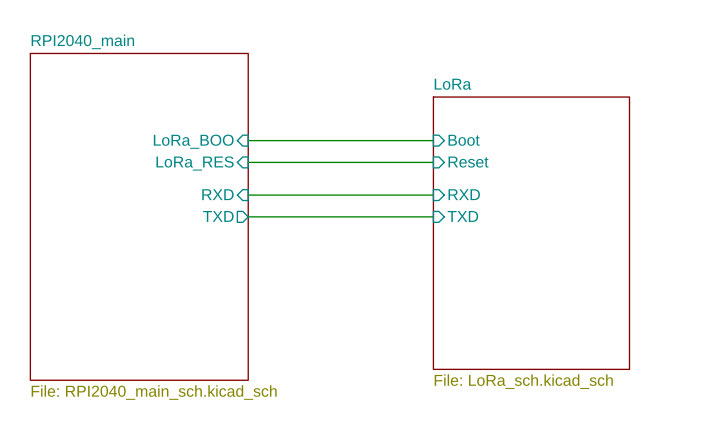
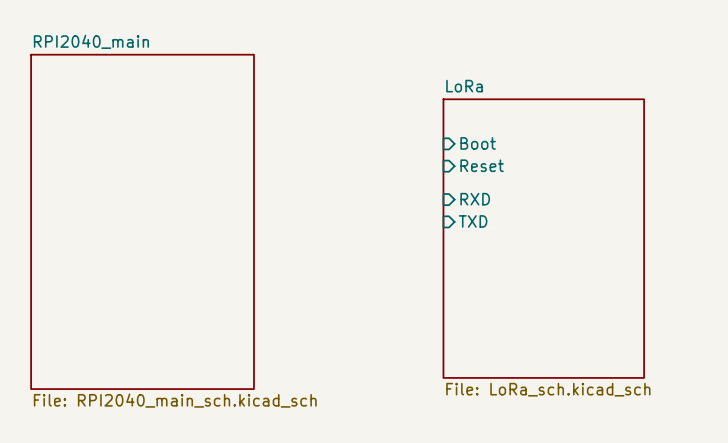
wire: (248, 140) (433, 140) -> none
sheet pin: LoRa_BOO (193, 141) -> none
wire: (248, 162) (433, 162) -> none
sheet pin: LoRa_RES (195, 163) -> none
sheet pin: RXD (217, 194) -> none
wire: (248, 195) (433, 195) -> none
sheet pin: TXD (218, 216) -> none
wire: (248, 216) (433, 216) -> none

